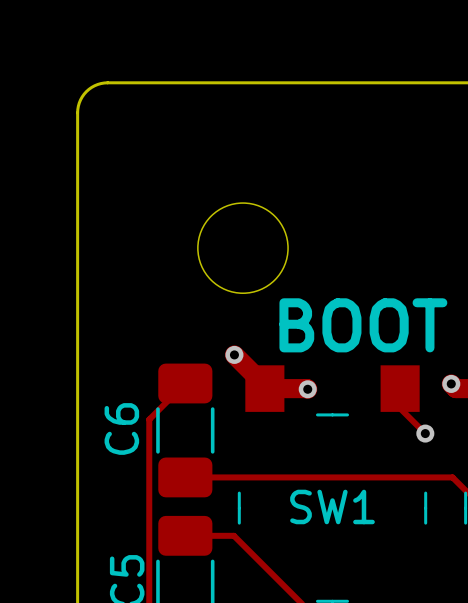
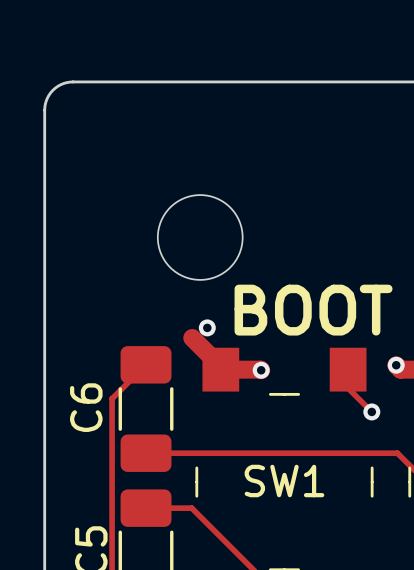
via position: (234, 354) -> (207, 327)

